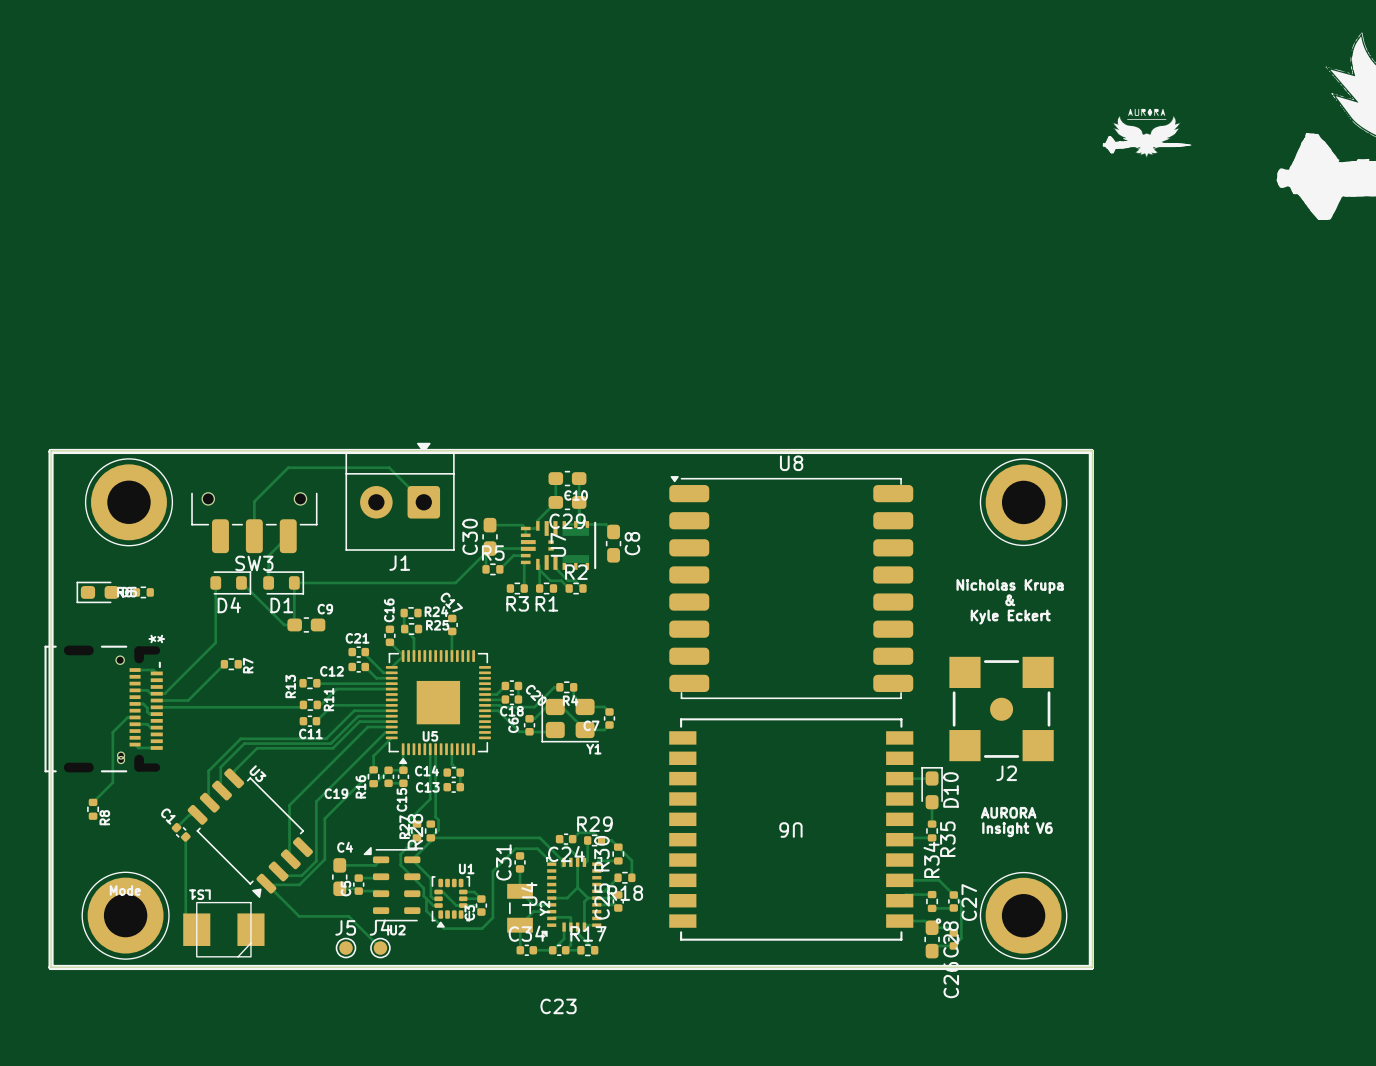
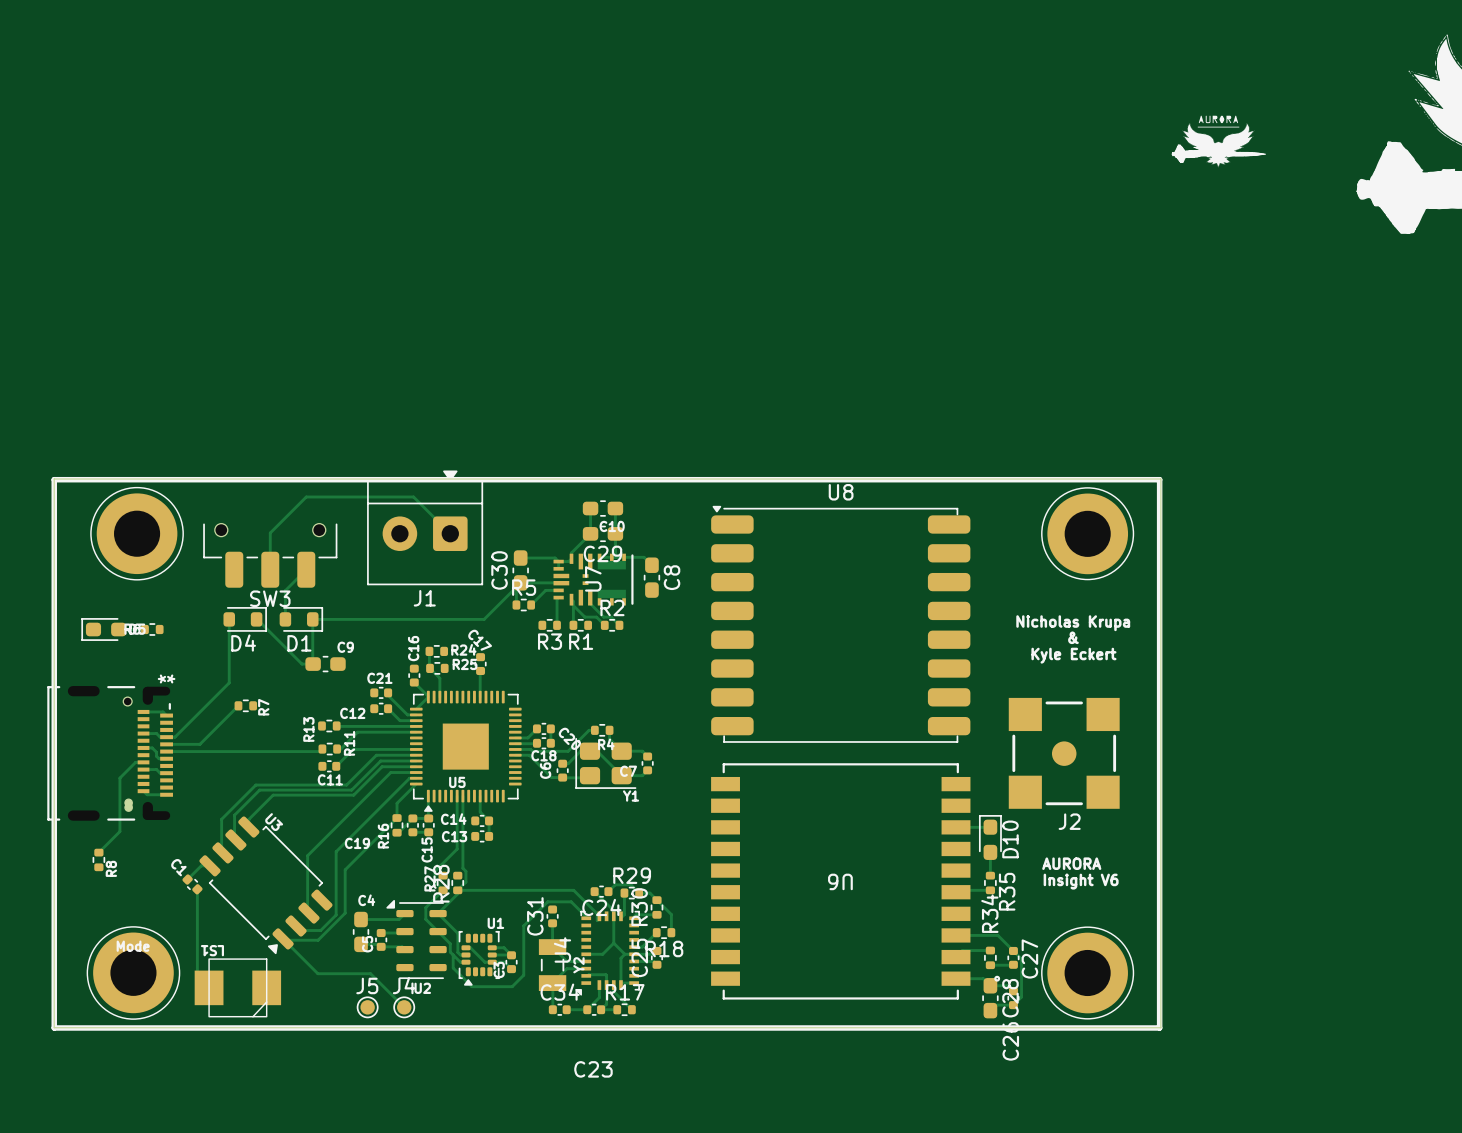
part footprint: [44, 645, 163, 773] -> [47, 686, 173, 821]

